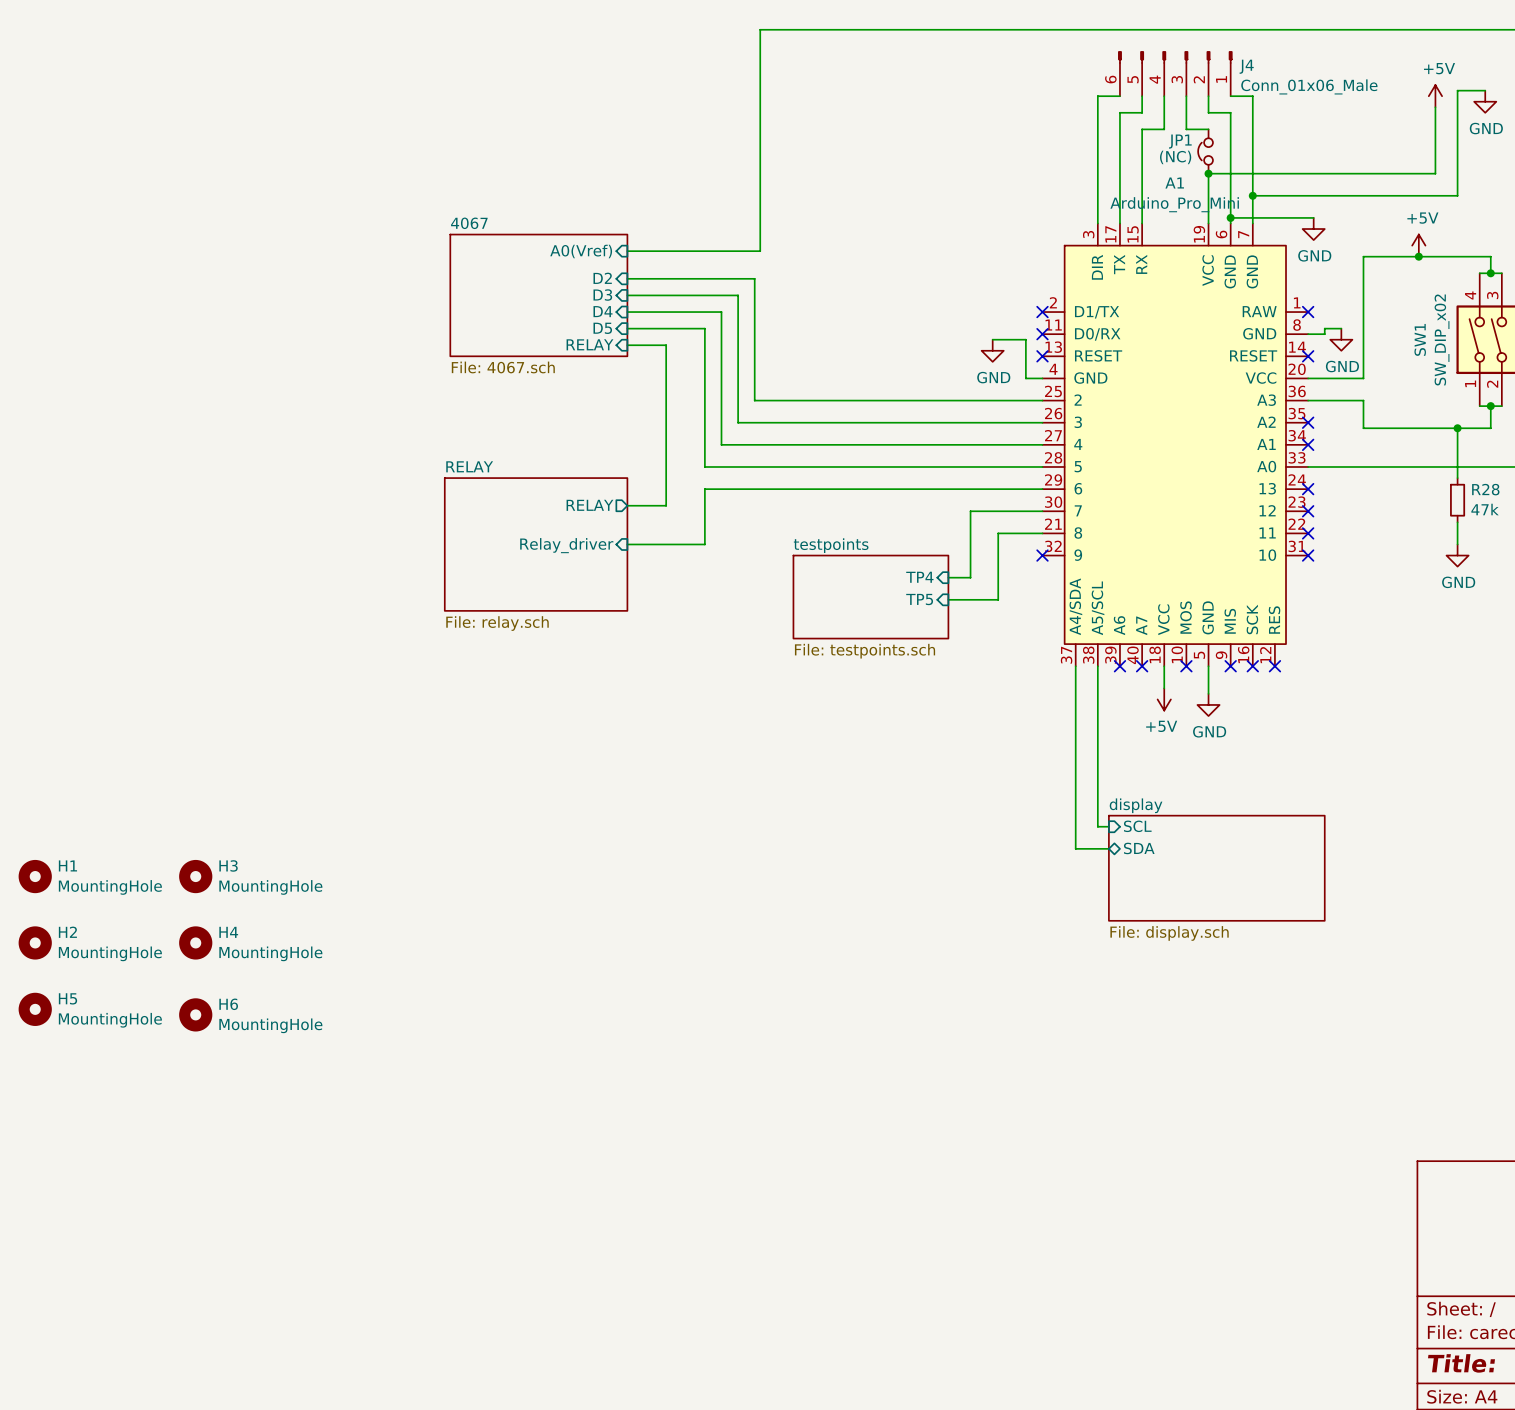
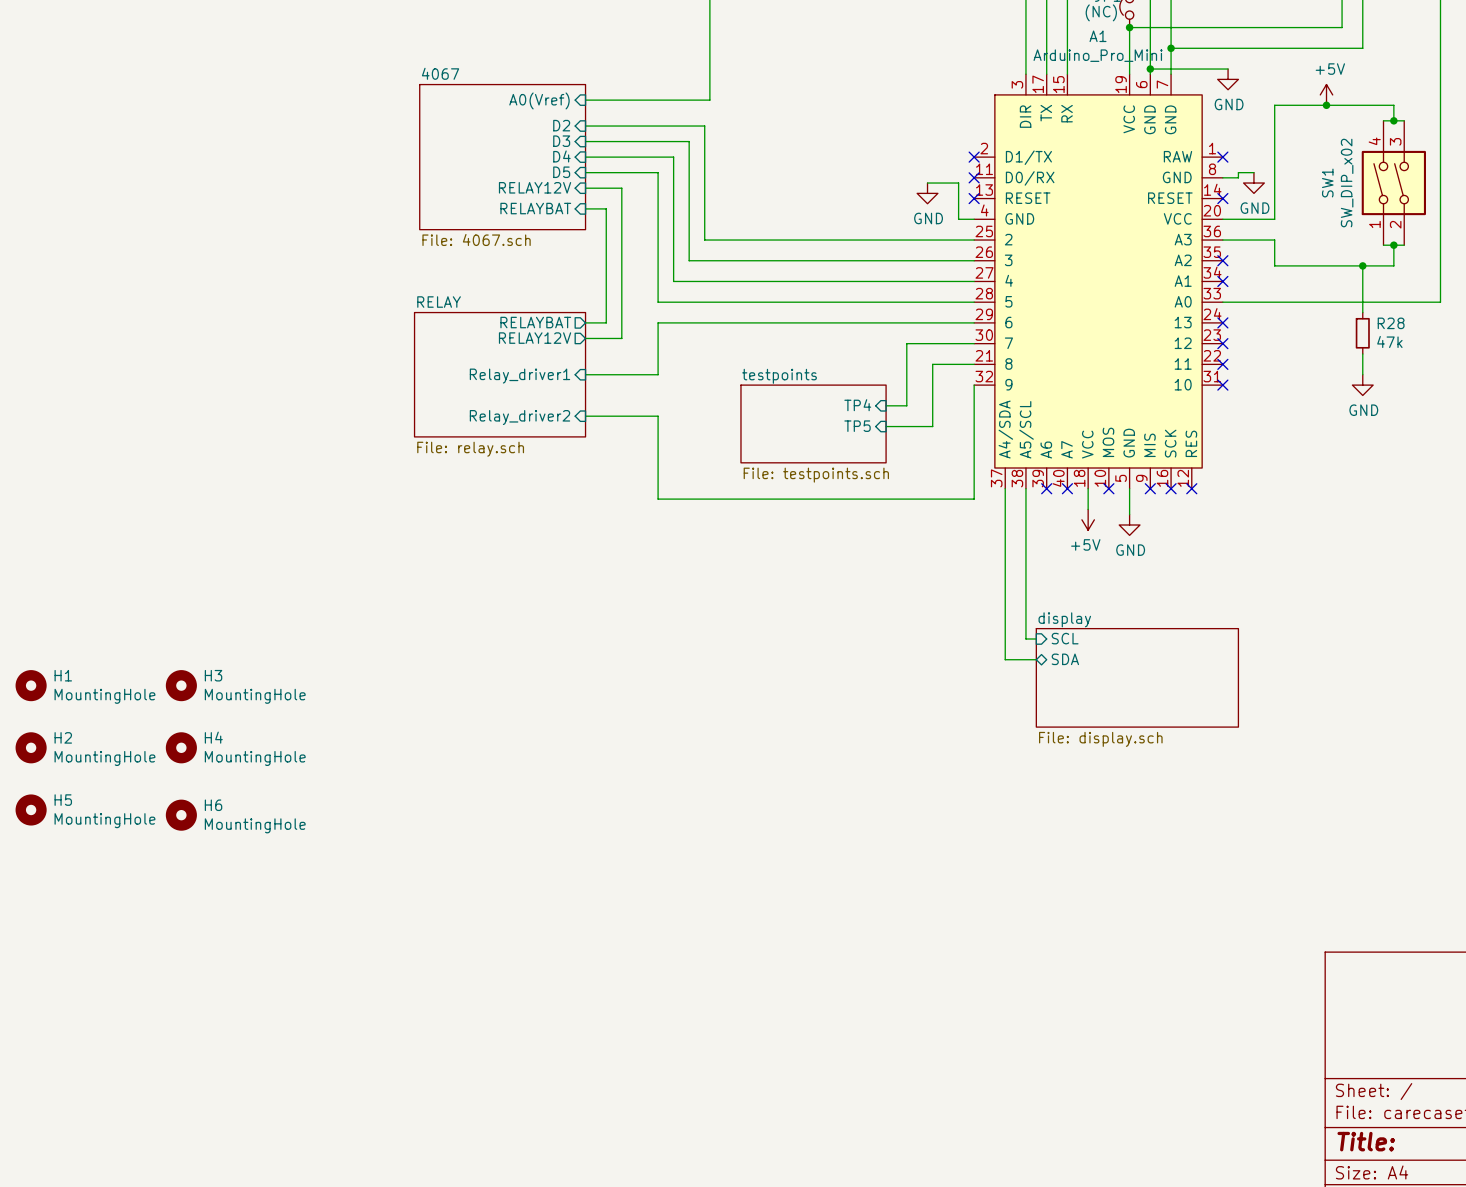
sheet 4067 shape: [450, 234, 628, 357] -> [419, 84, 586, 230]
sheet pin: RELAY (589, 344) -> RELAY12V (535, 187)
sheet pin: none -> RELAYBAT (535, 208)
wire: none -> (585, 208) (606, 208) (606, 322) (585, 322)
sheet pin: none -> RELAYBAT (535, 322)
sheet pin: RELAY (589, 505) -> RELAY12V (535, 338)
sheet pin: Relay_driver (566, 545) -> Relay_driver1 (519, 376)
wire: none -> (974, 385) (974, 499) (658, 499) (658, 416) (585, 416)
no-connect mark: (1042, 555) -> none
sheet pin: none -> Relay_driver2 (519, 417)

